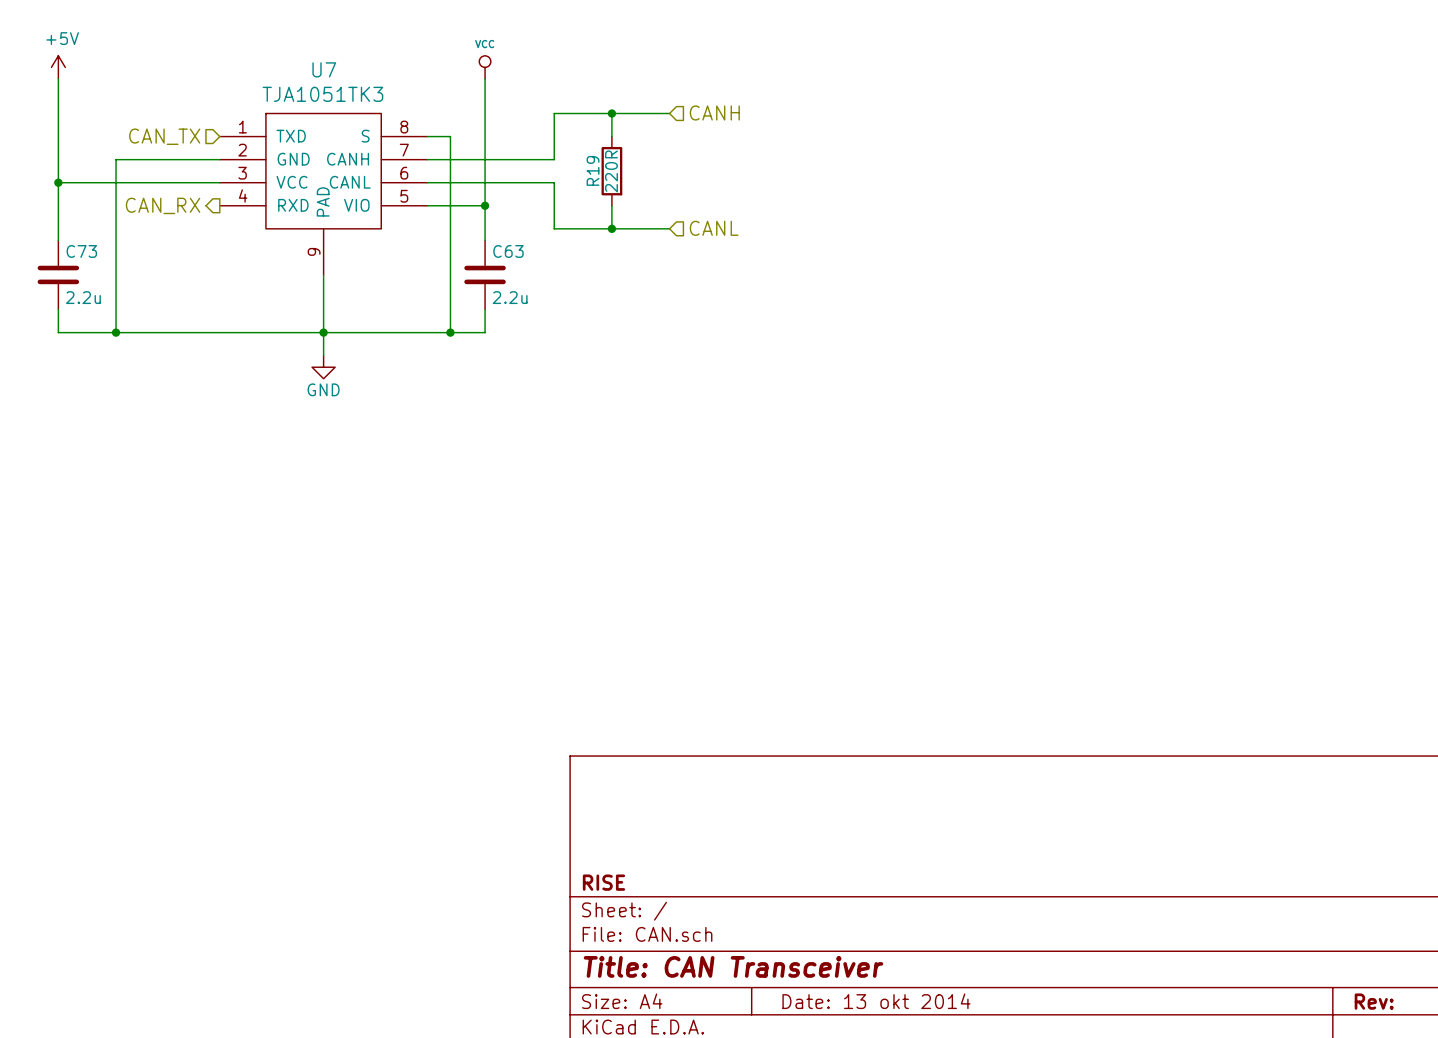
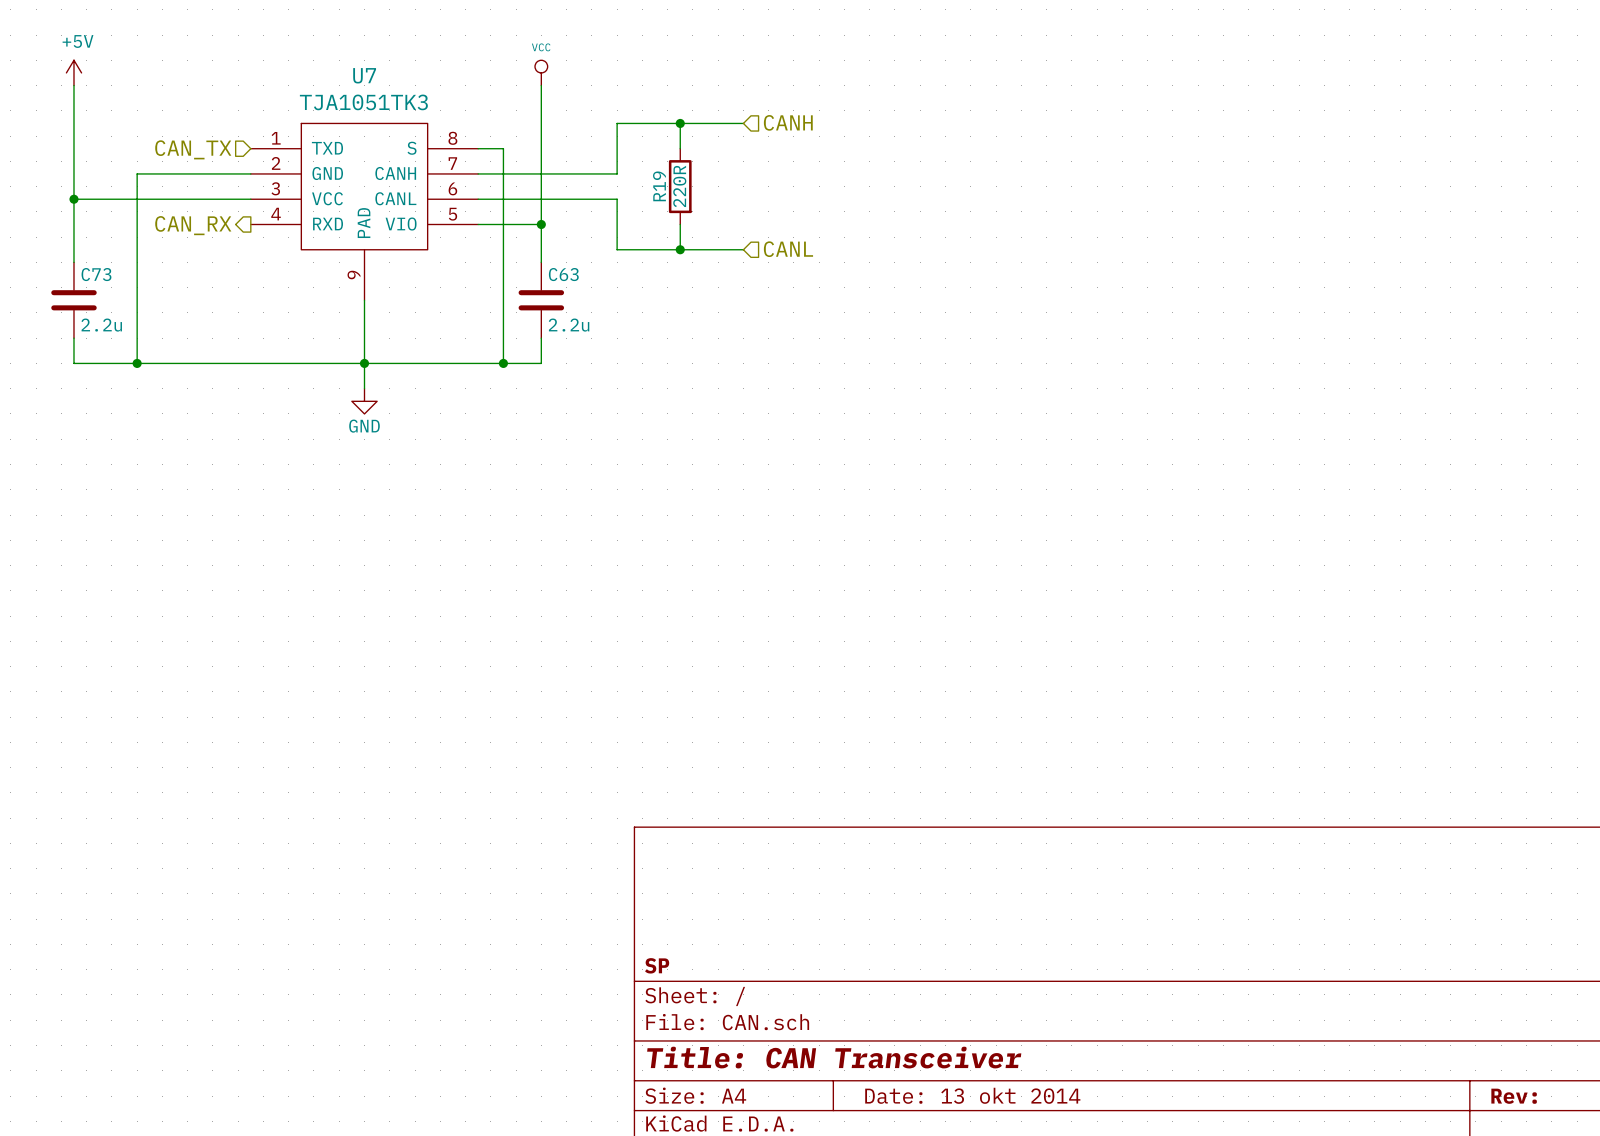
title block: RISE (603, 882) -> SP (657, 965)

